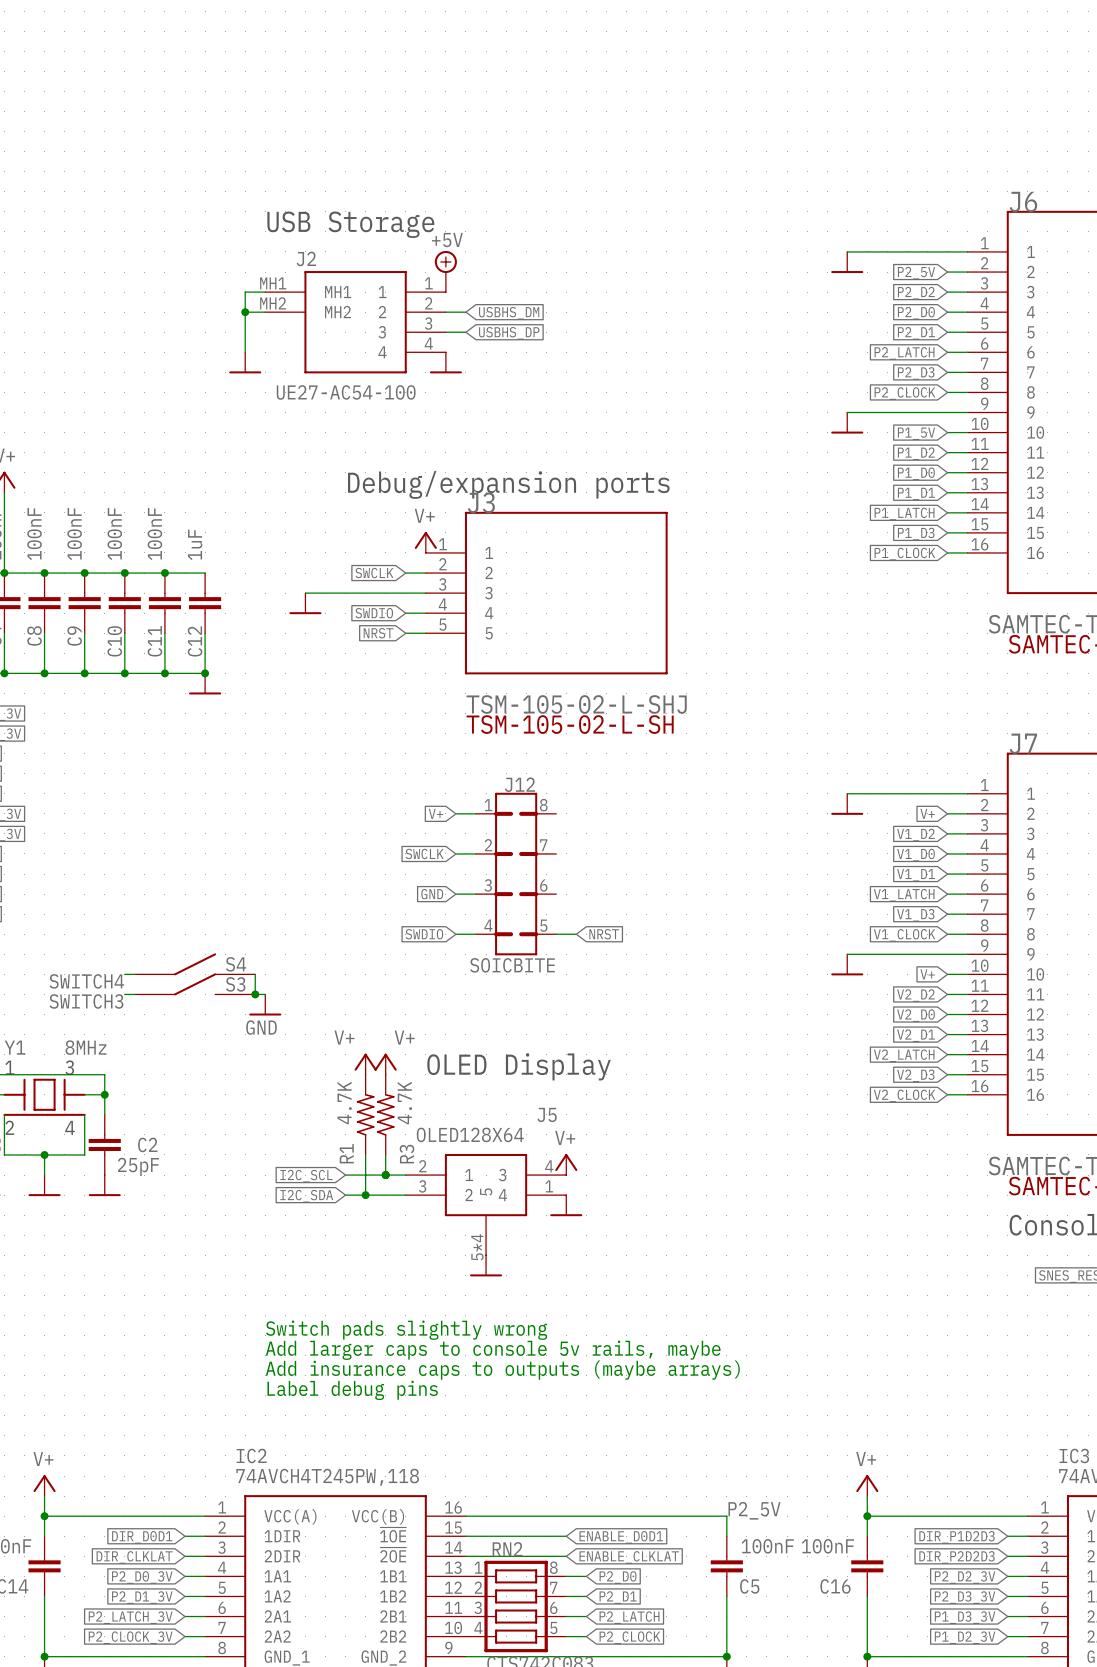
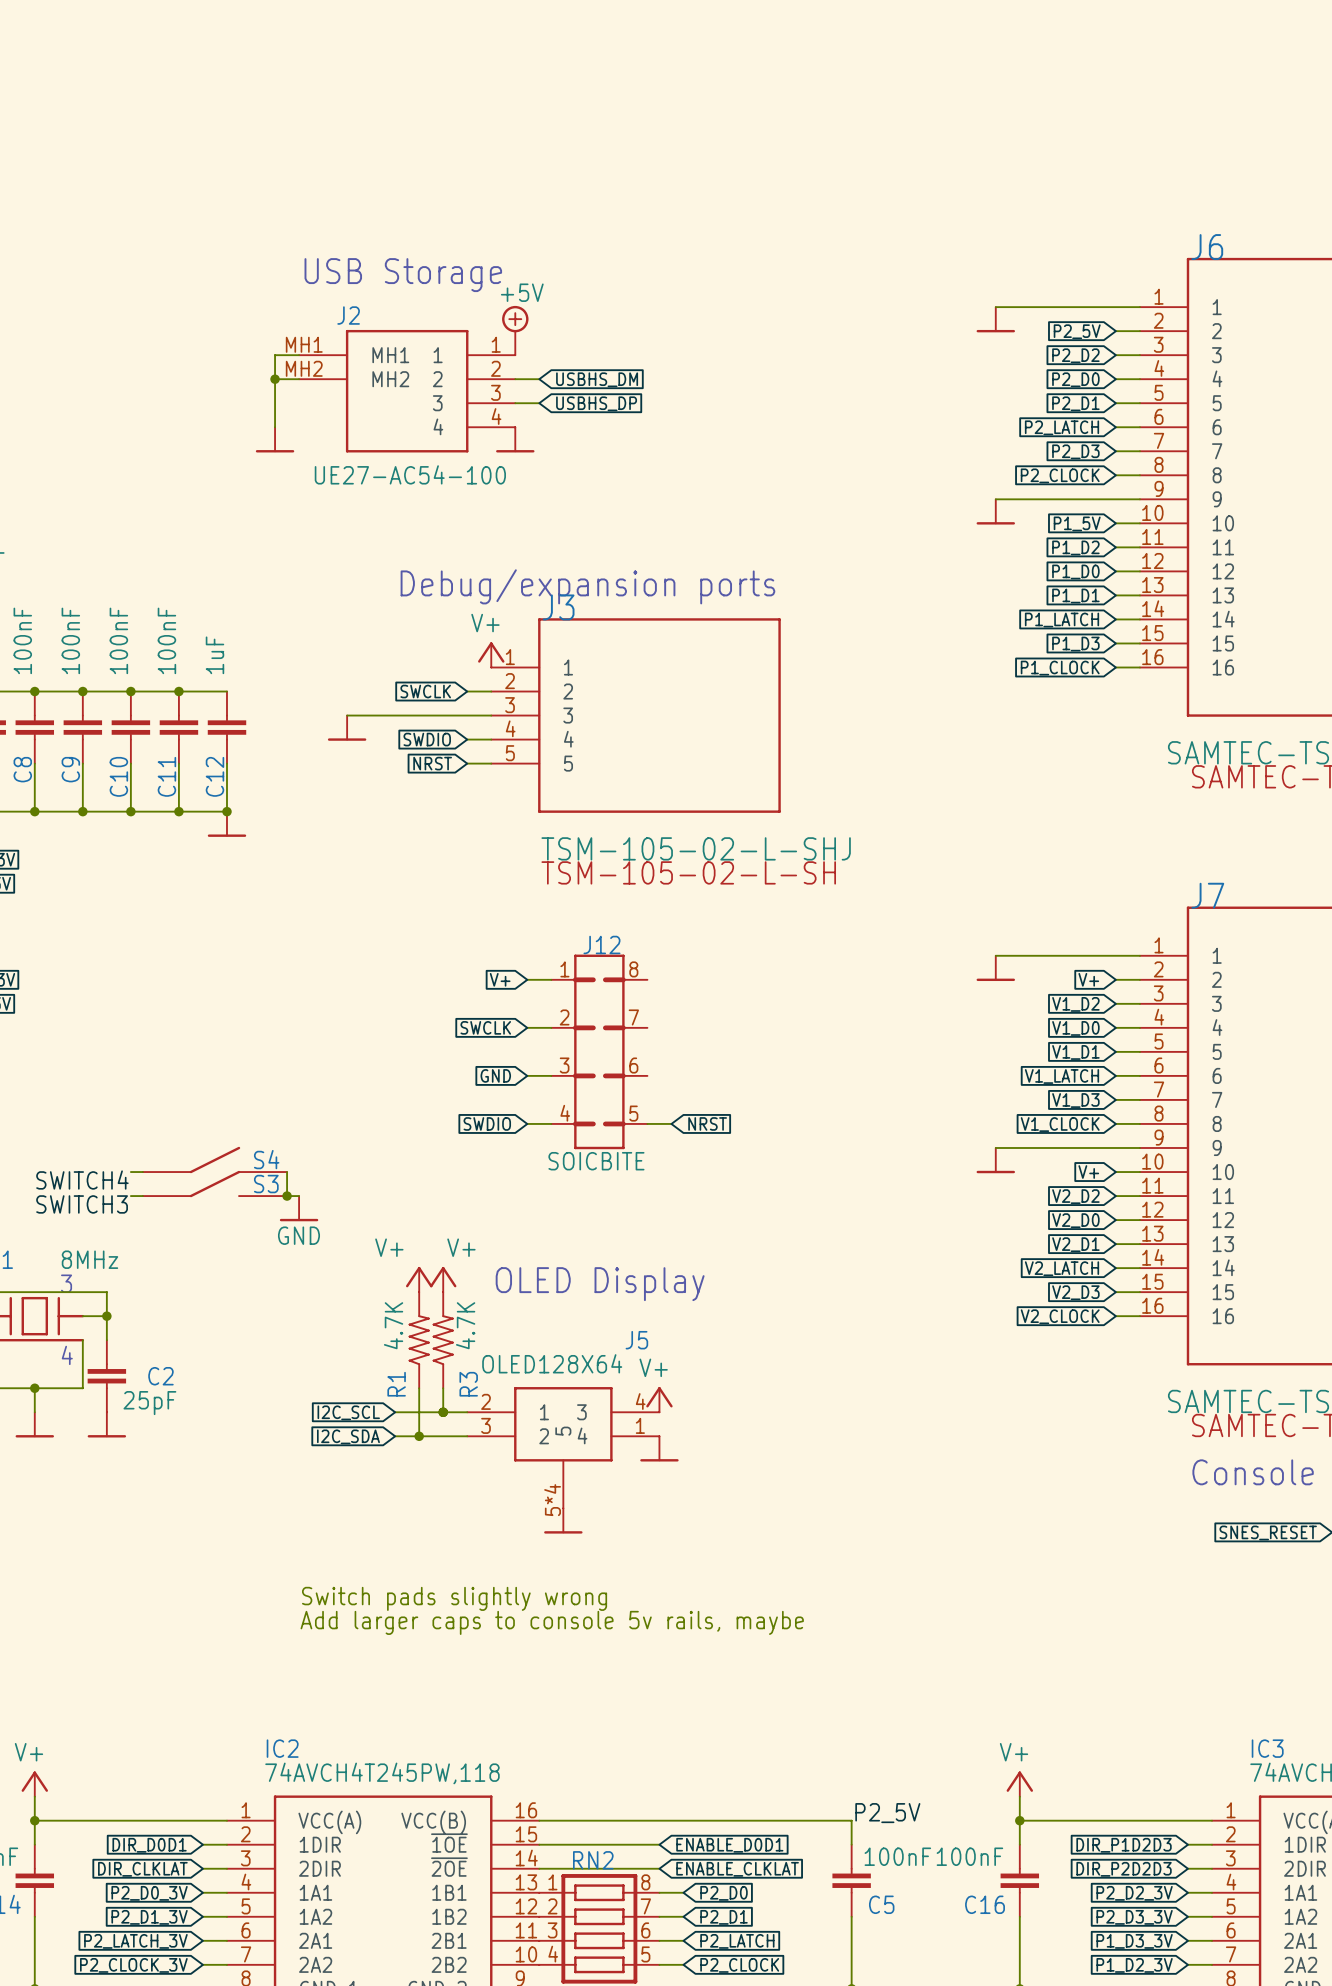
text: Add insurance caps to outputs (maybe arrays) (502, 1370) -> none
text: Label debug pins (352, 1390) -> none

